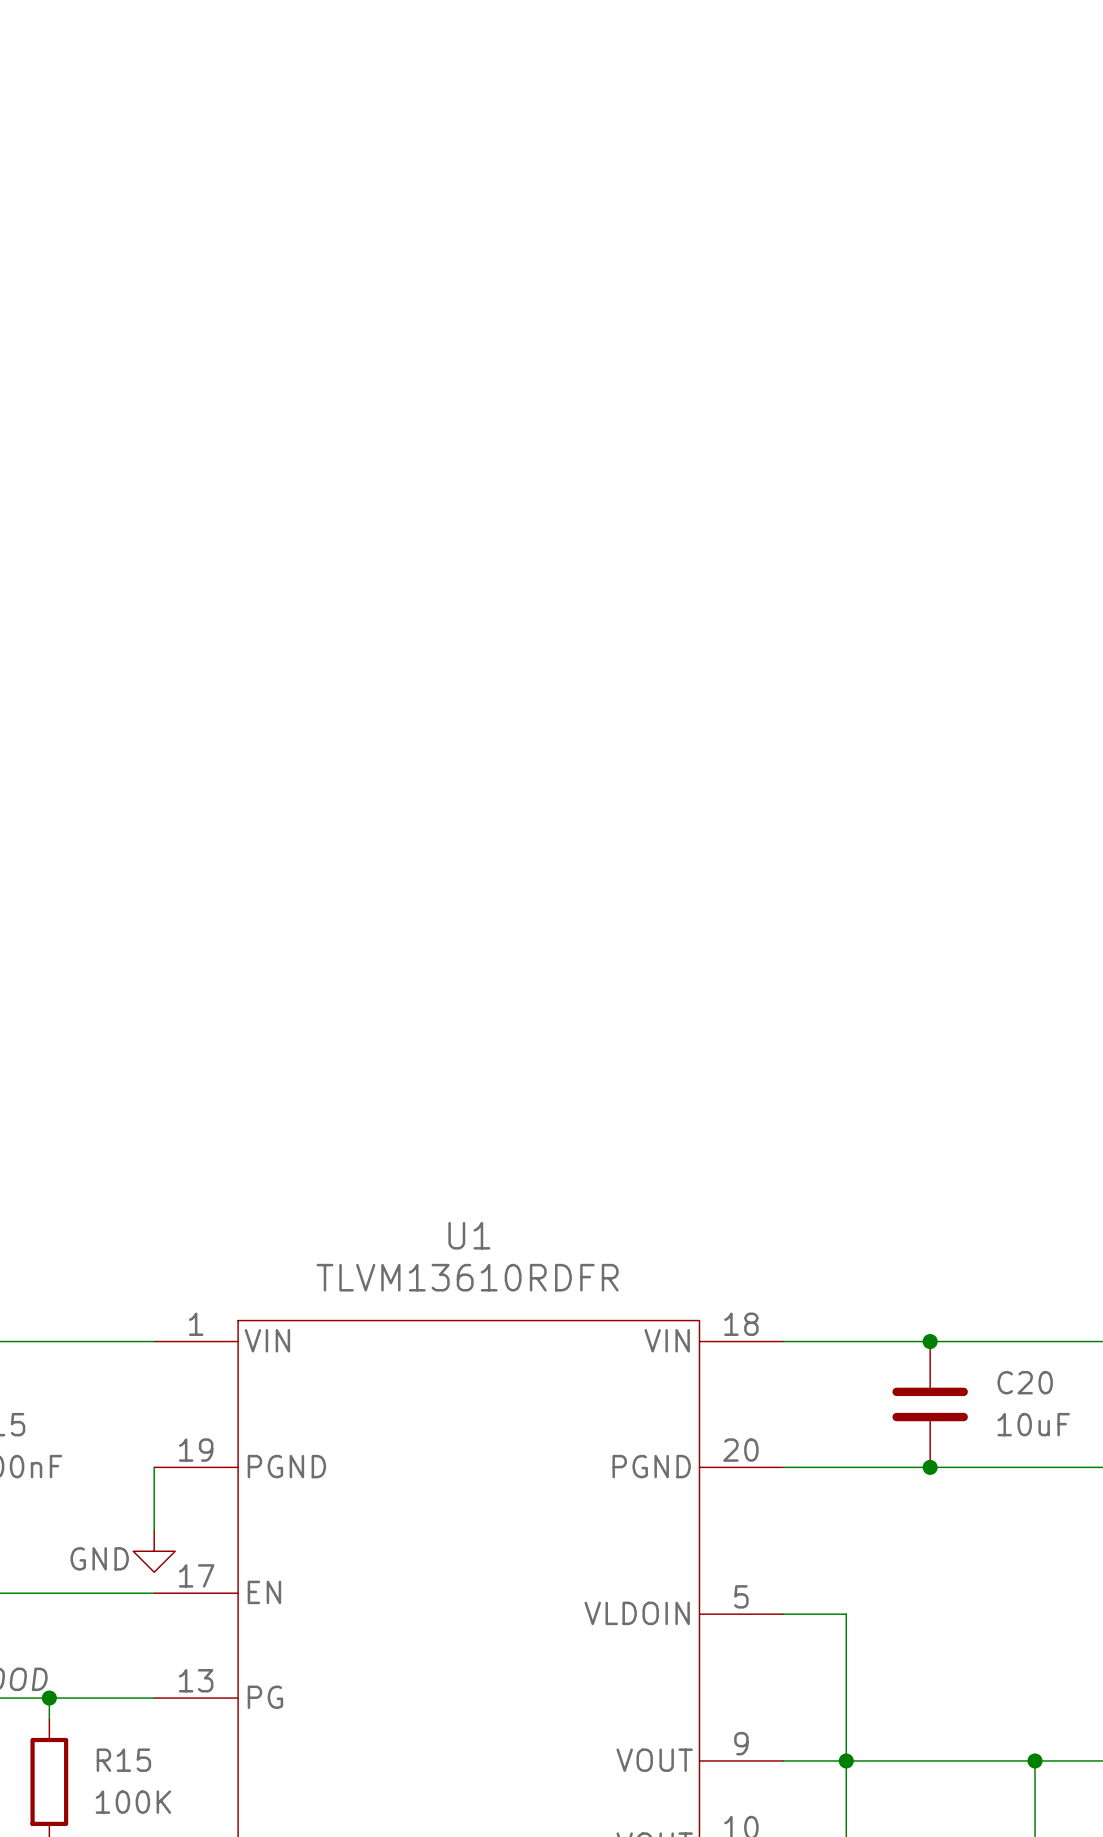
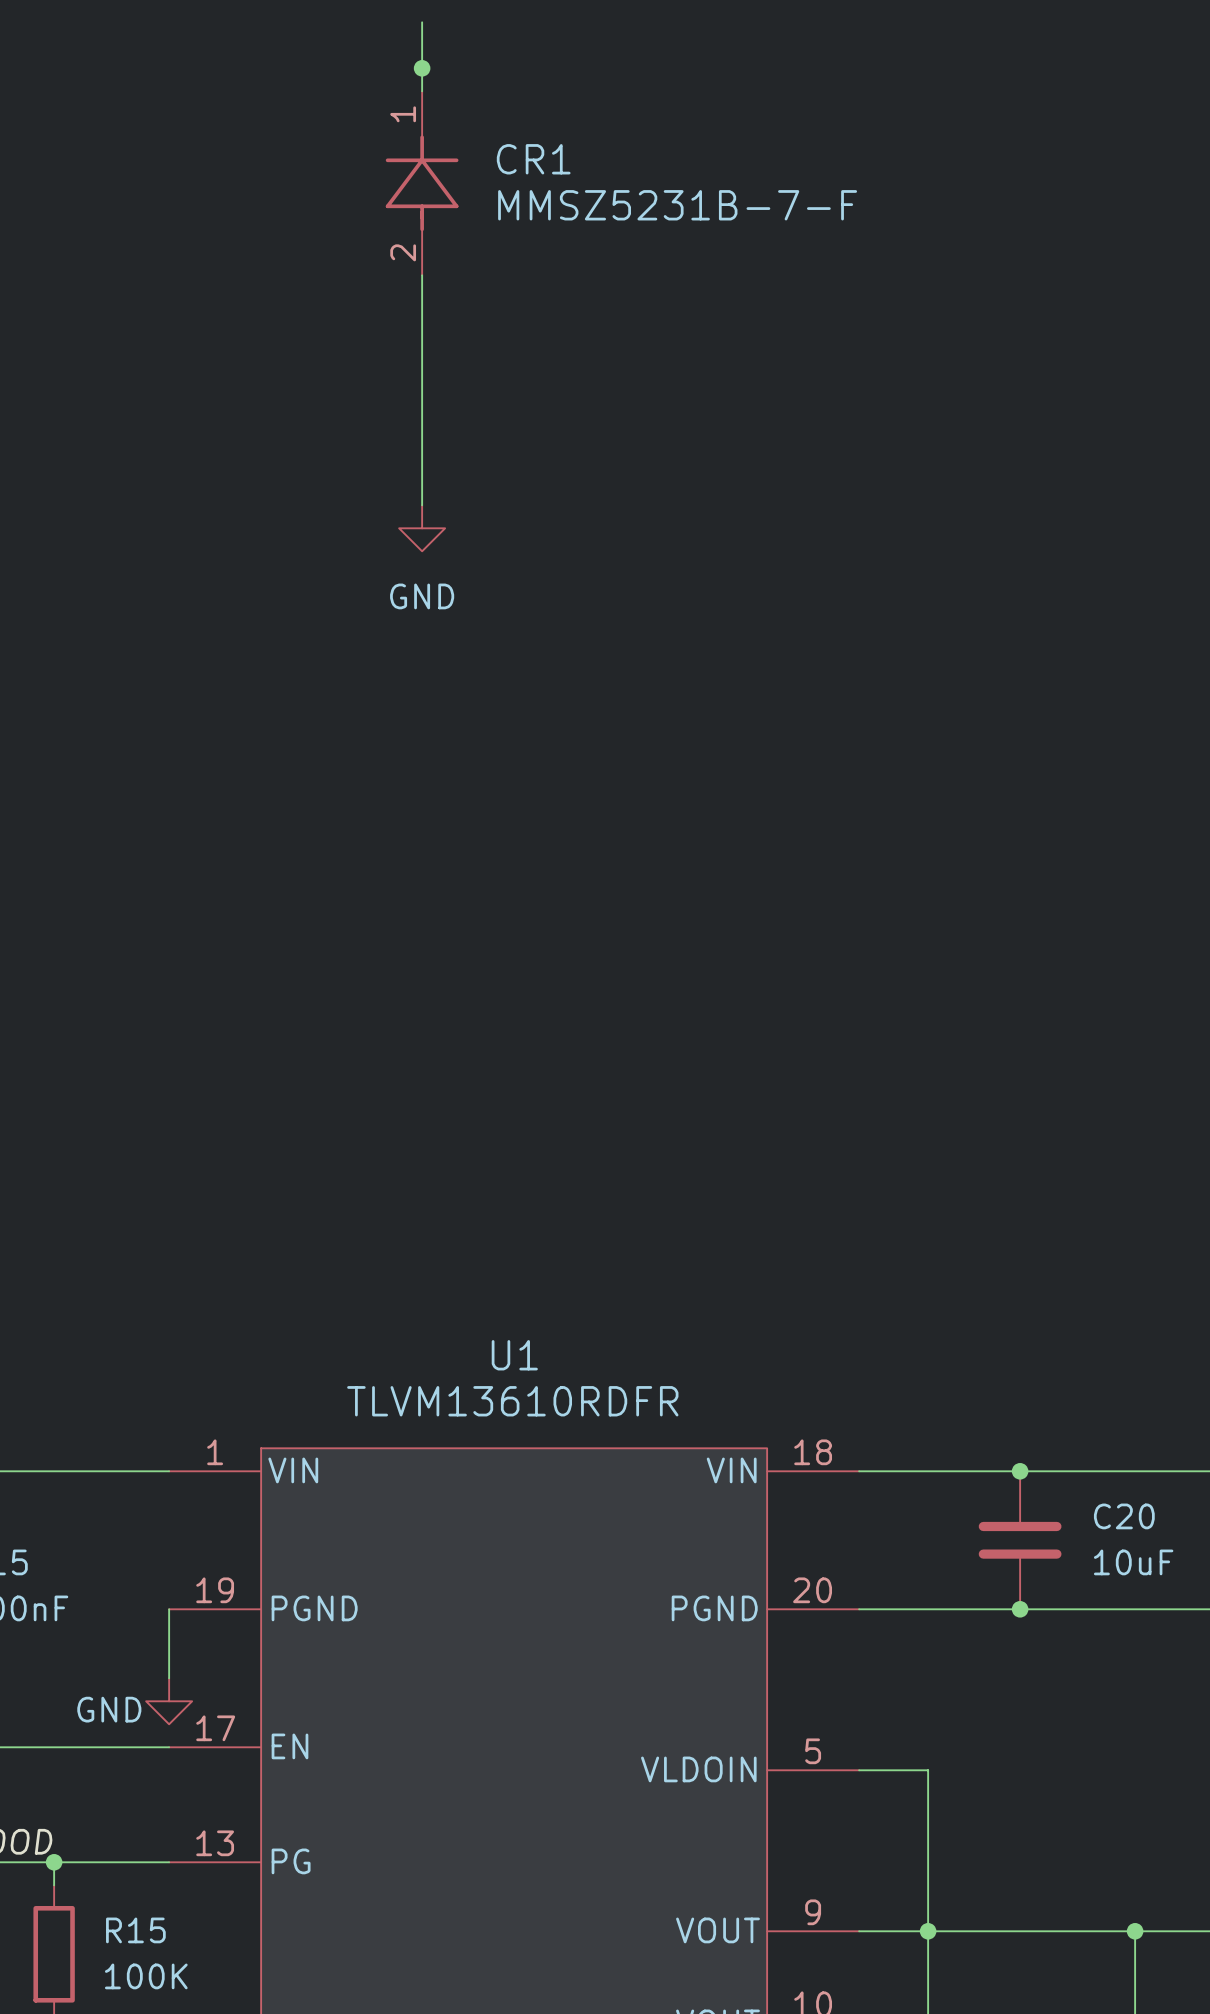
wire: none -> (422, 22) (422, 91)
junction: none -> (422, 68)
CR1: none -> MMSZ5231B-7-F (422, 183)
wire: none -> (422, 275) (422, 505)
power symbol: none -> GND (422, 528)

